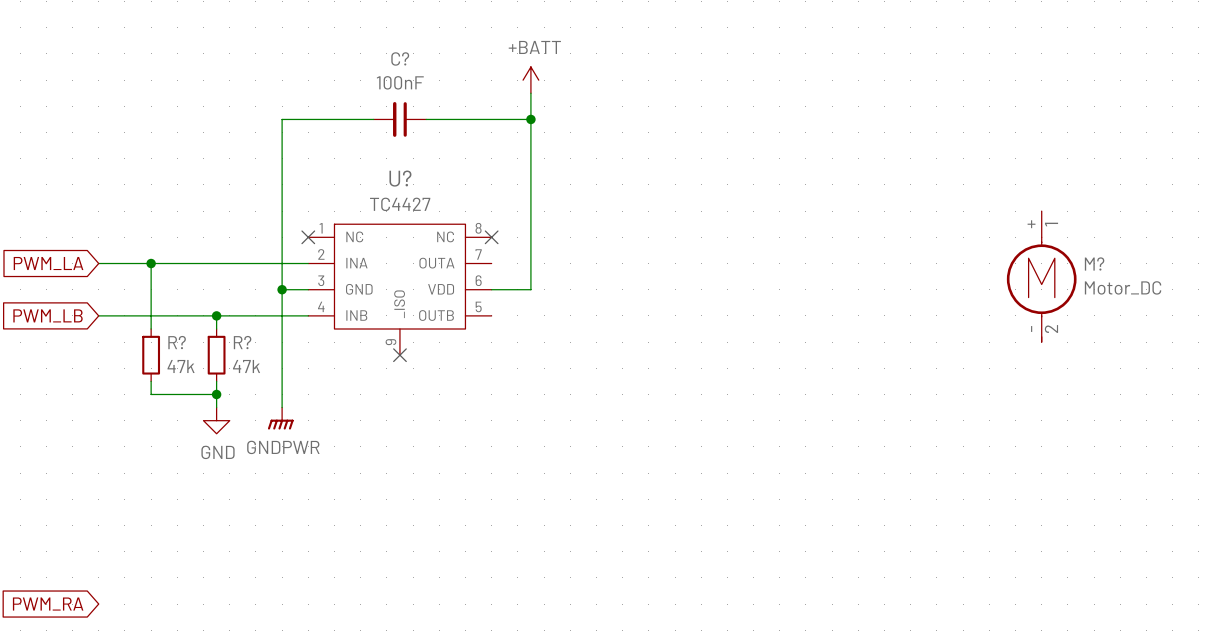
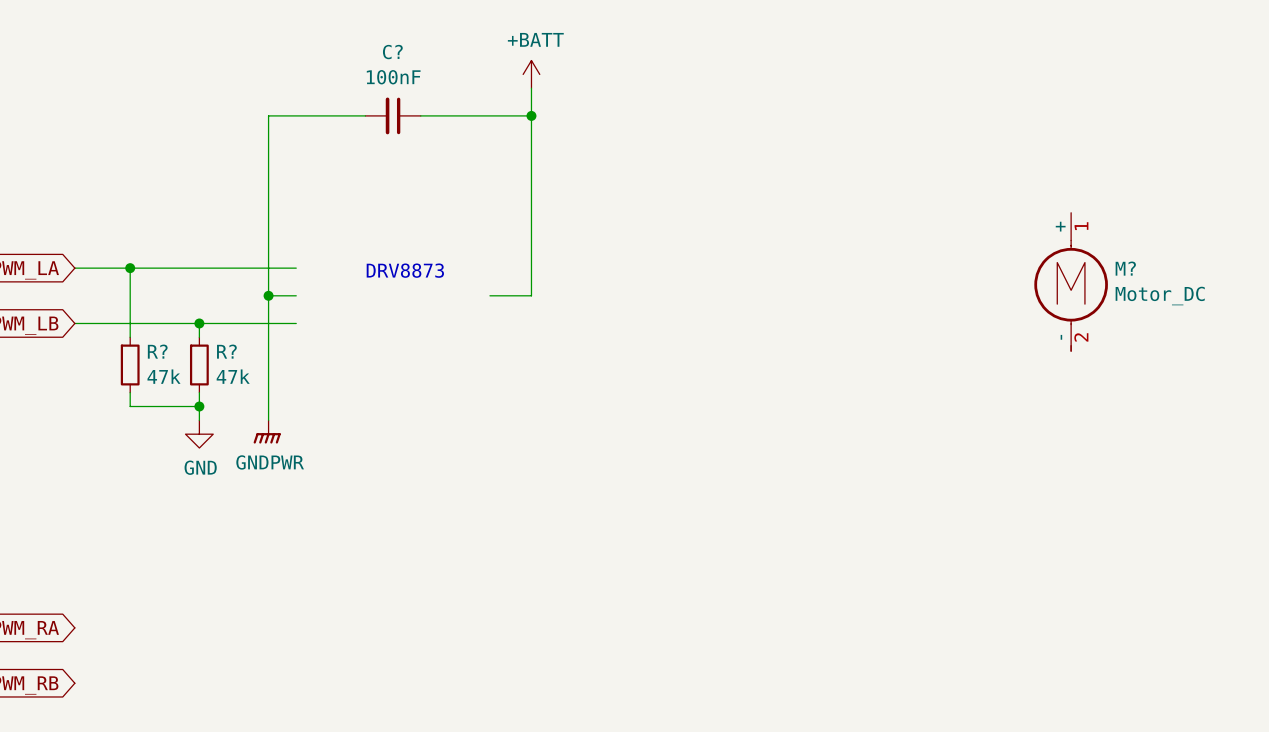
no-connect mark: (308, 237) -> none
no-connect mark: (491, 237) -> none
text: none -> DRV8873 (405, 270)
U?: TC4427 (399, 289) -> none
no-connect mark: (399, 355) -> none

